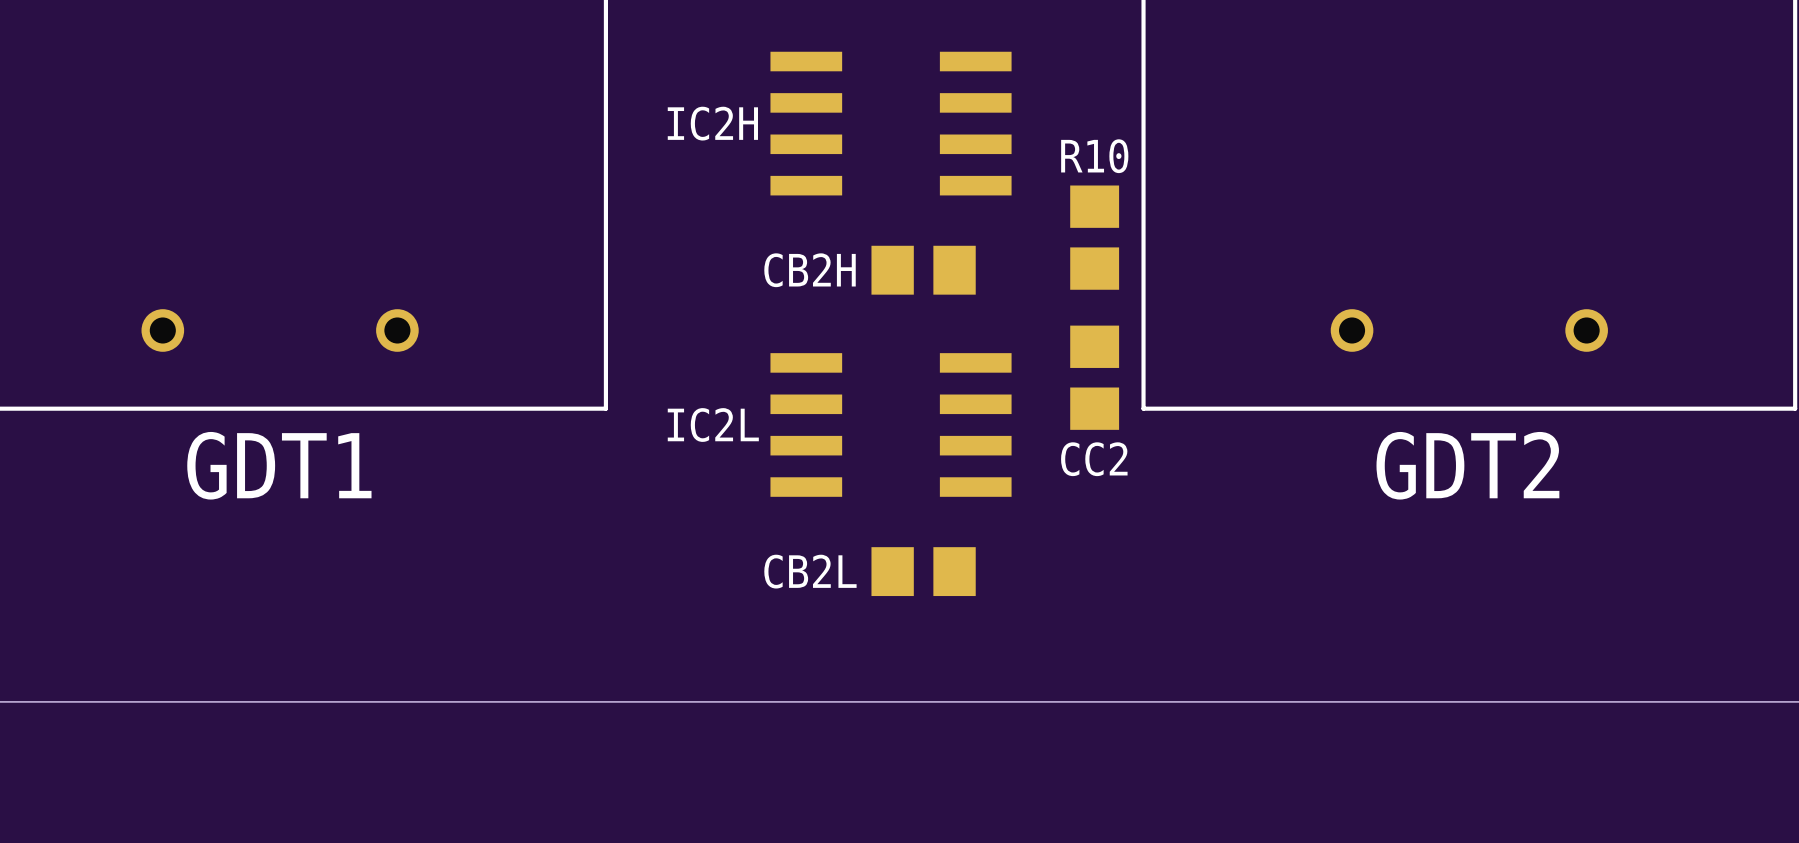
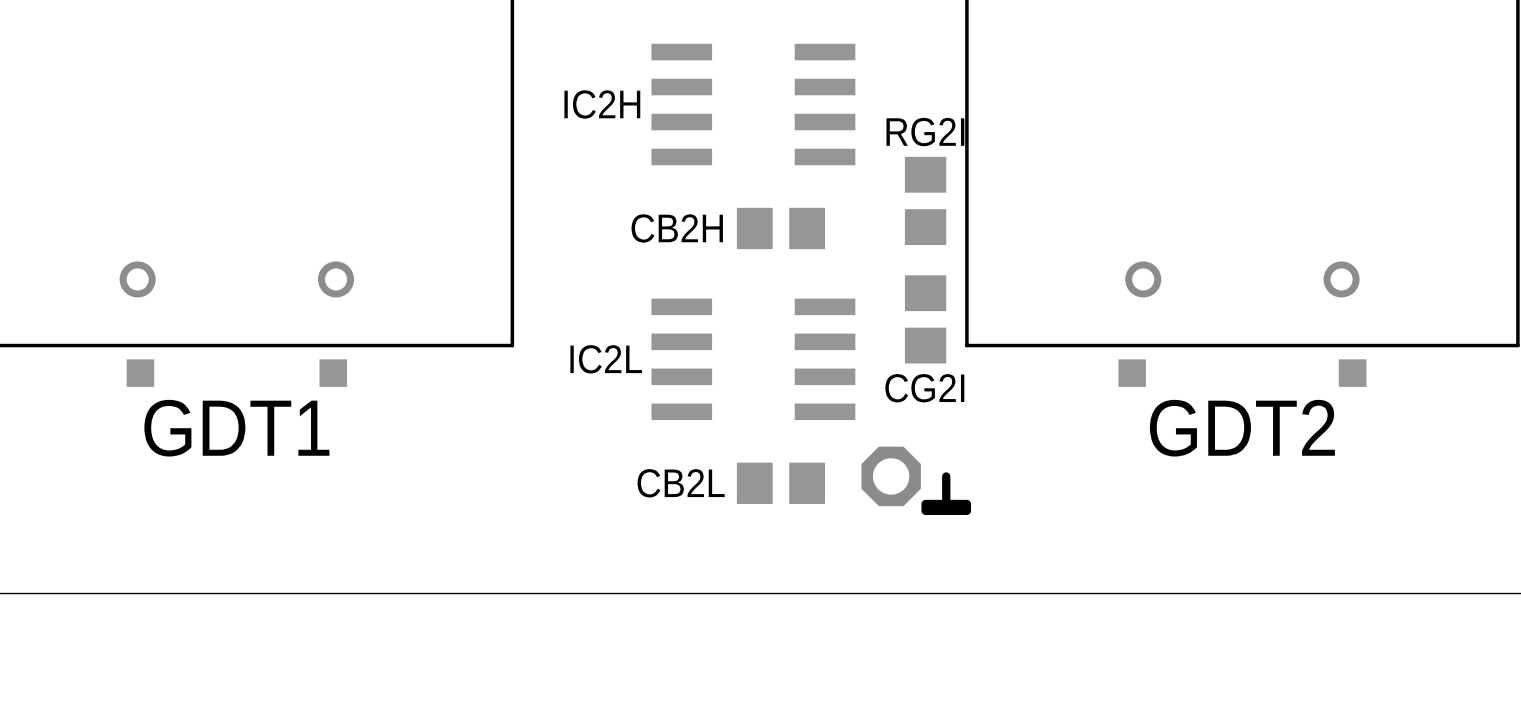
R10 name: R10 (1094, 156) -> RG2I (925, 132)
part: none -> (140, 373)
part: none -> (333, 373)
part: none -> (1132, 373)
part: none -> (1352, 373)
CC2 name: CC2 (1094, 459) -> CG2I (924, 388)
GDT1 name position: GDT1 (279, 465) -> GDT1 (236, 428)
GDT2 name position: GDT2 (1467, 465) -> GDT2 (1242, 428)
part: none -> (891, 476)
line: none -> (946, 476) (946, 503)
drawing: none -> [921, 499, 972, 515]

